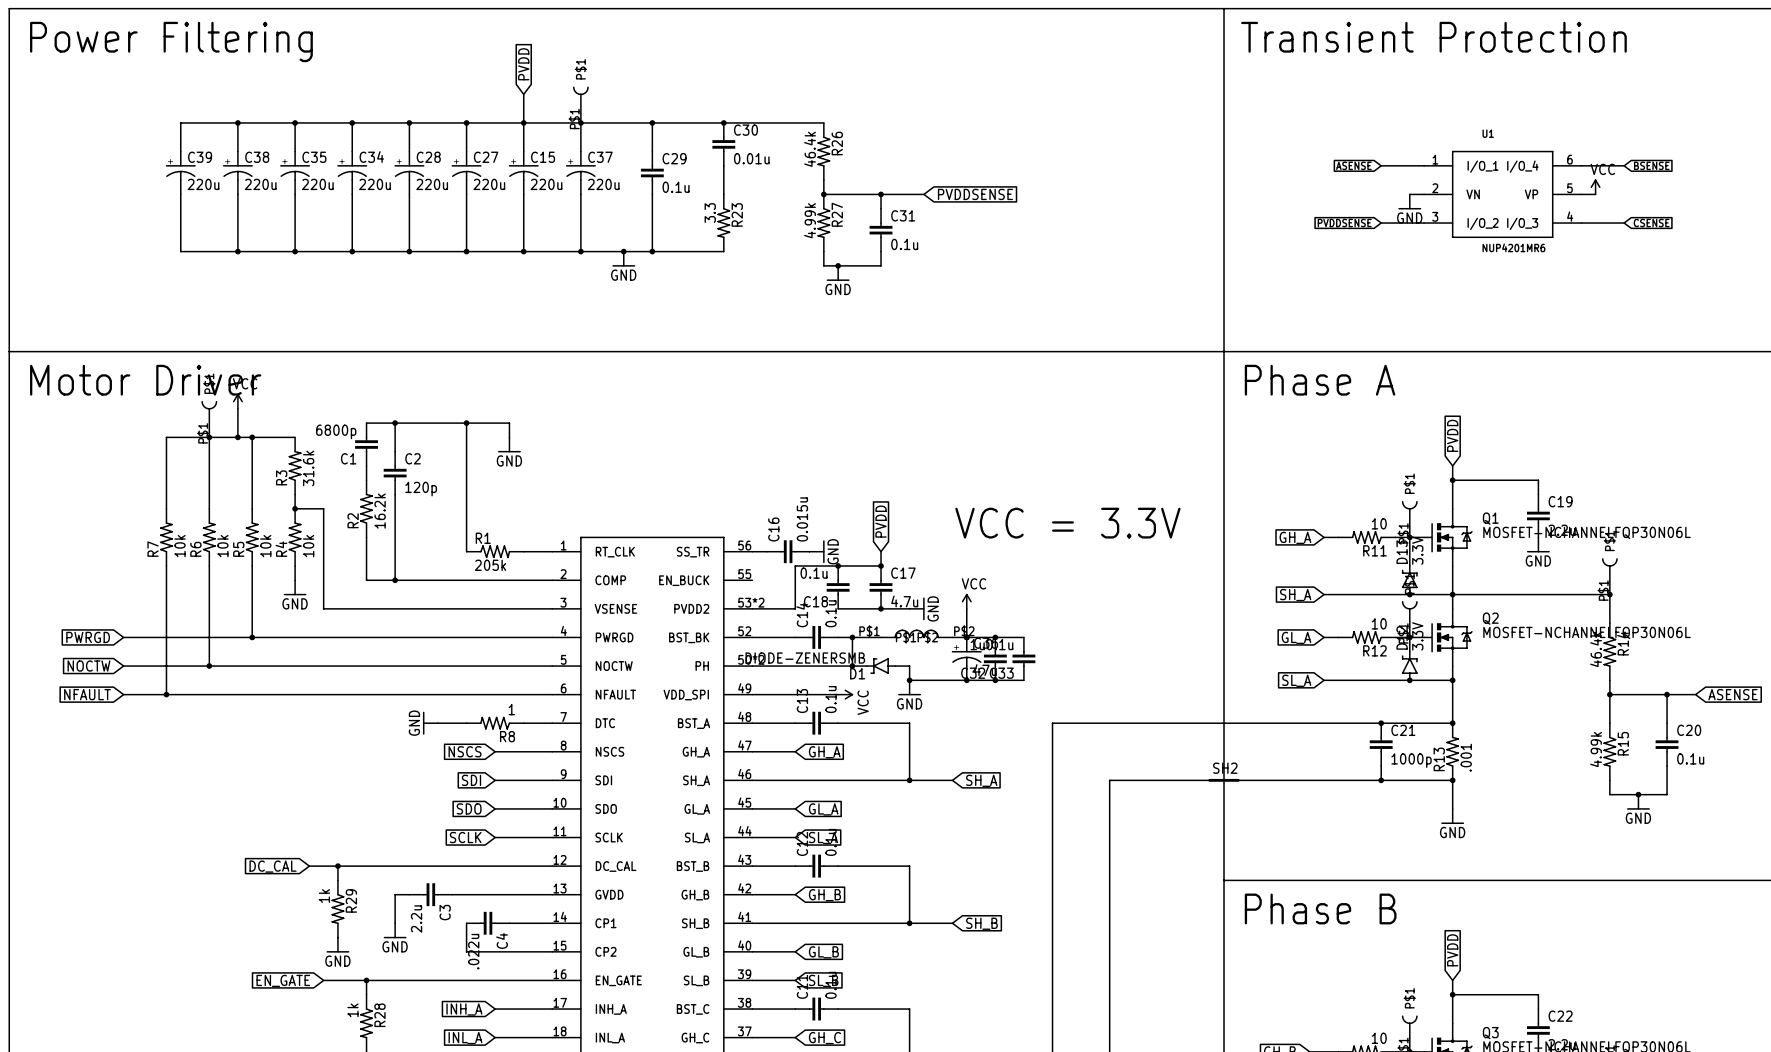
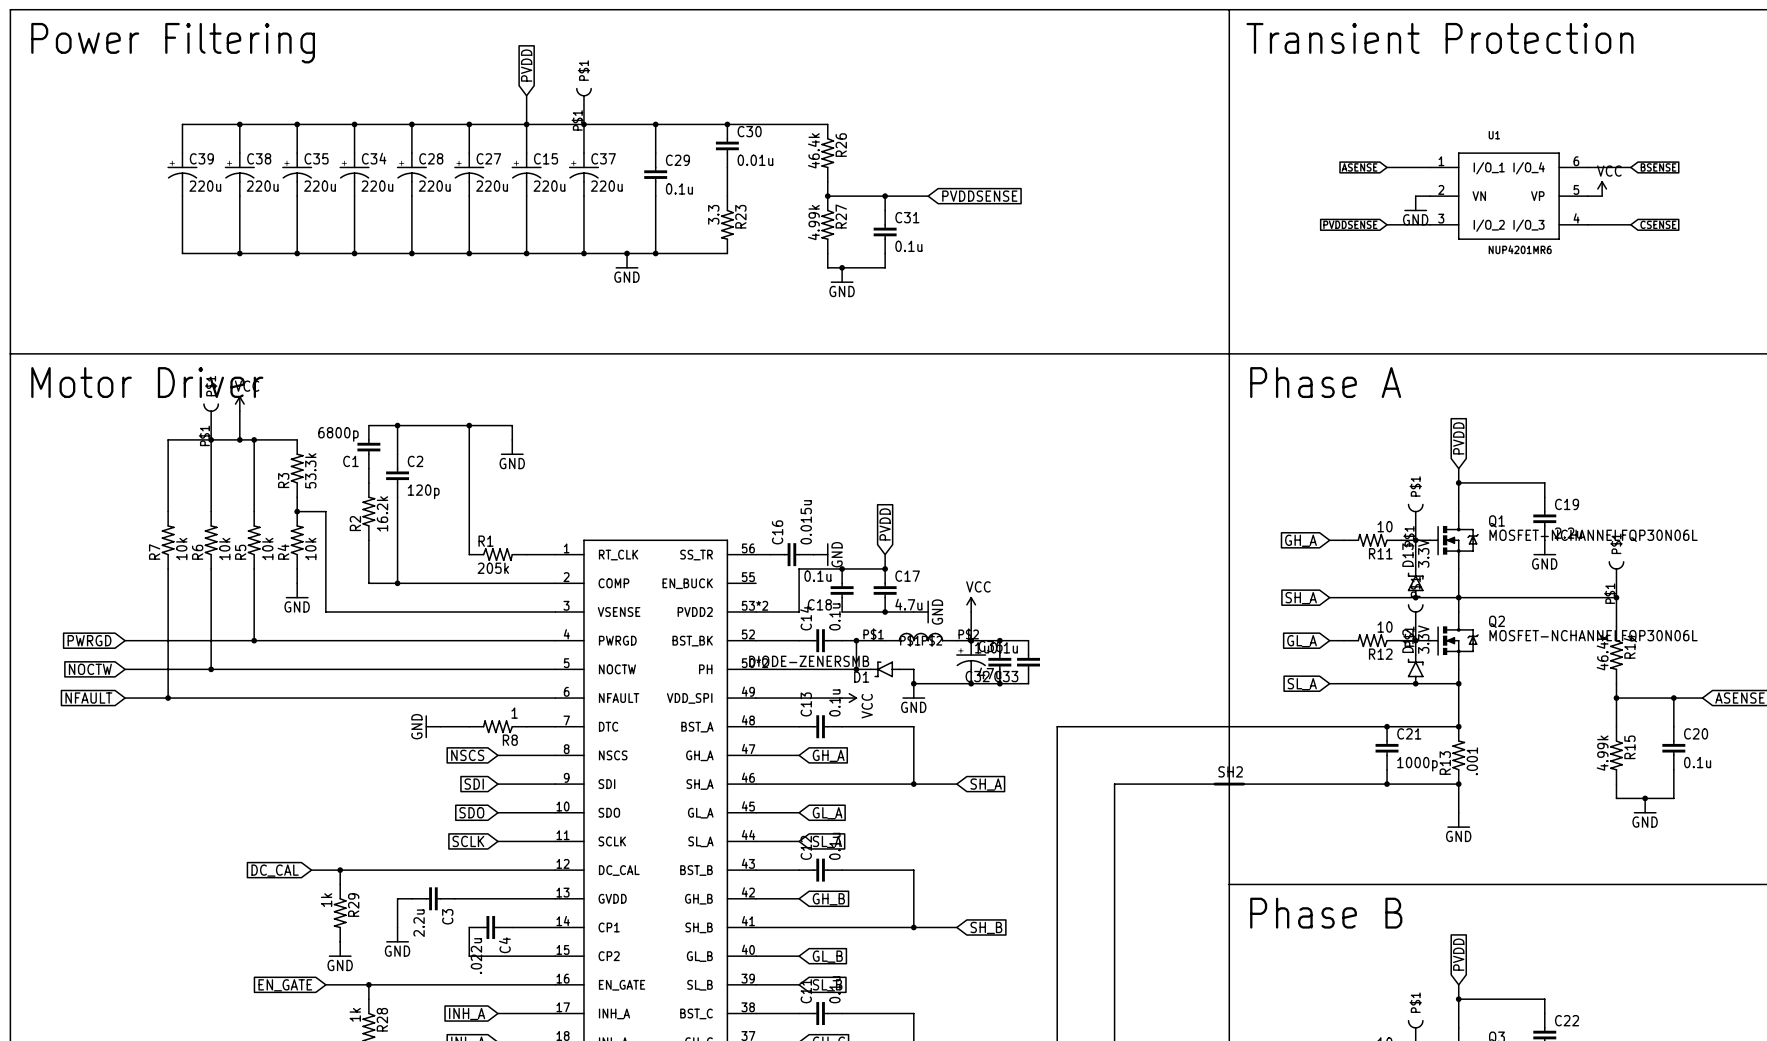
R3 value: 31.6k (308, 468) -> 53.3k (310, 470)
text: VCC = 3.3V (1067, 523) -> none

